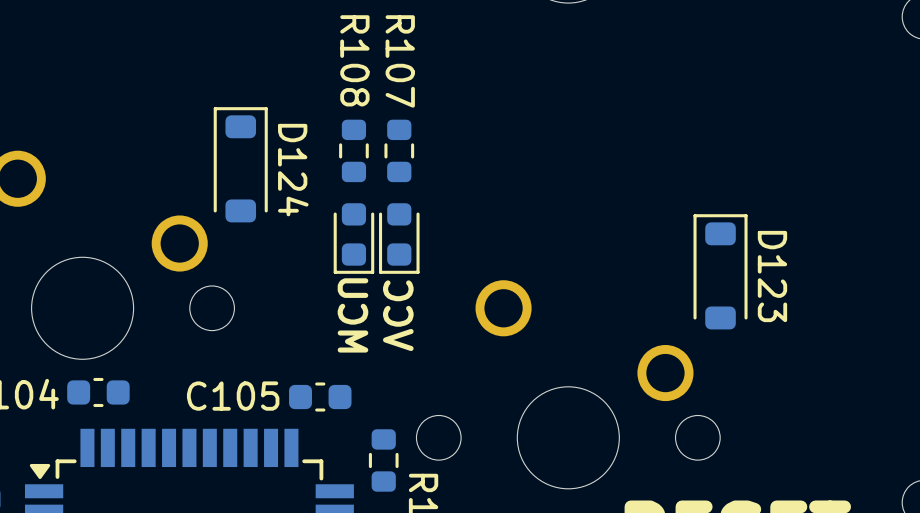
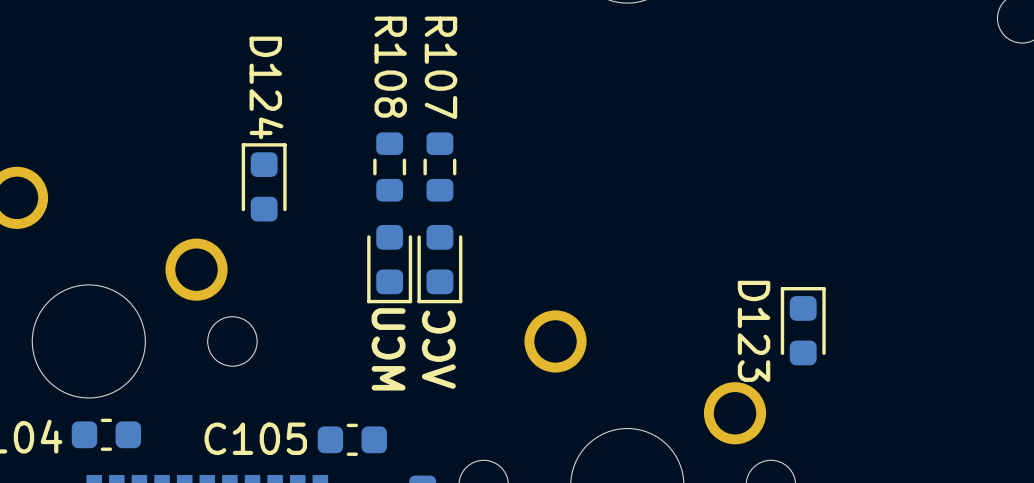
D124 footprint: [213, 107, 268, 223] -> [241, 143, 287, 222]
D124 name position: D124 (293, 170) -> D124 (266, 87)
D123 footprint: [693, 214, 748, 330] -> [780, 287, 826, 366]
D123 name position: D123 (772, 276) -> D123 (754, 331)

